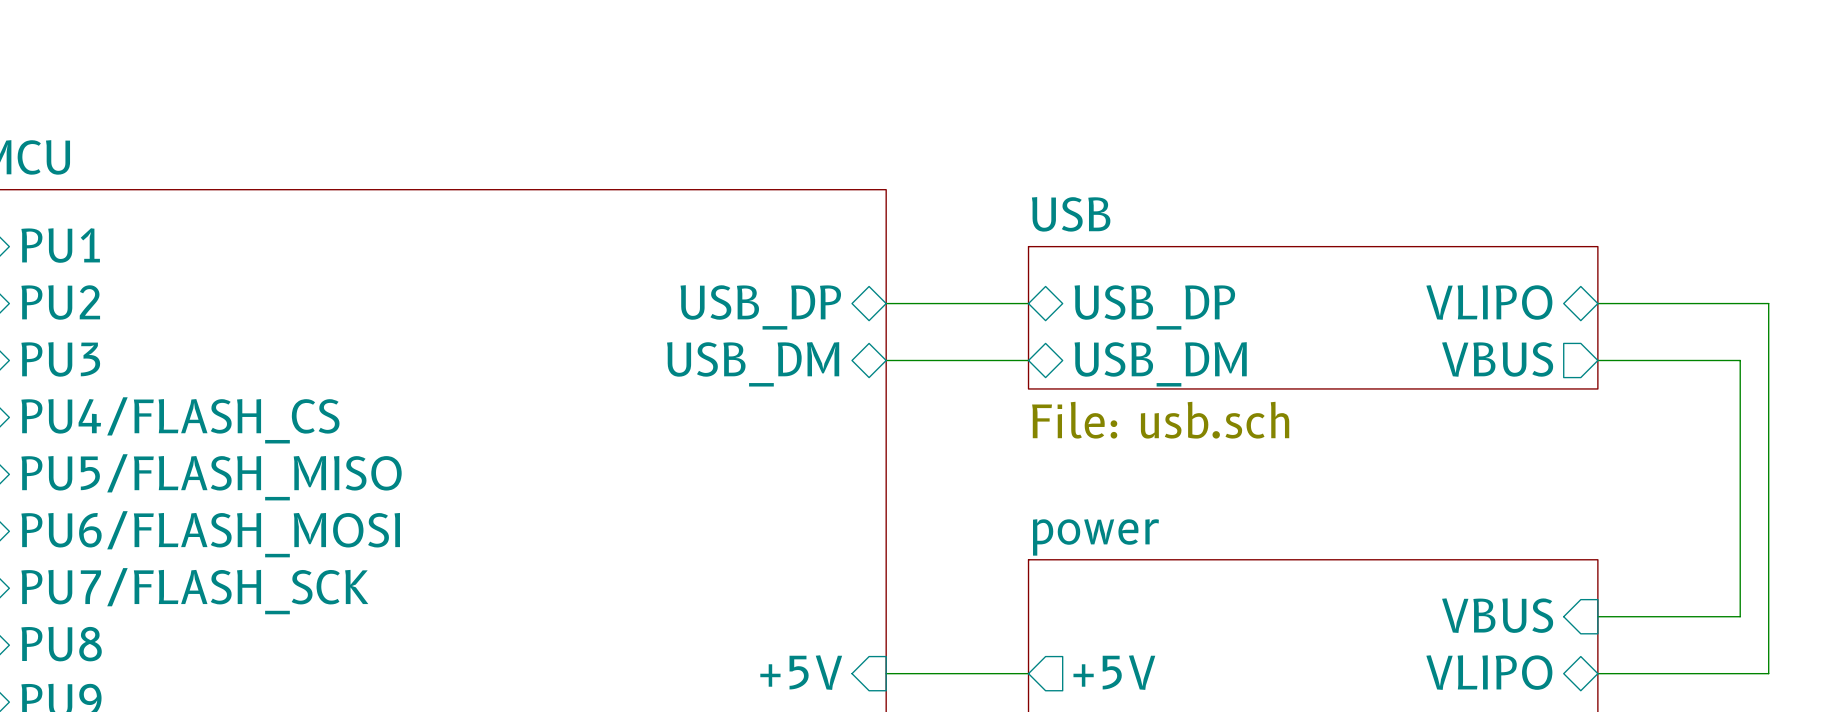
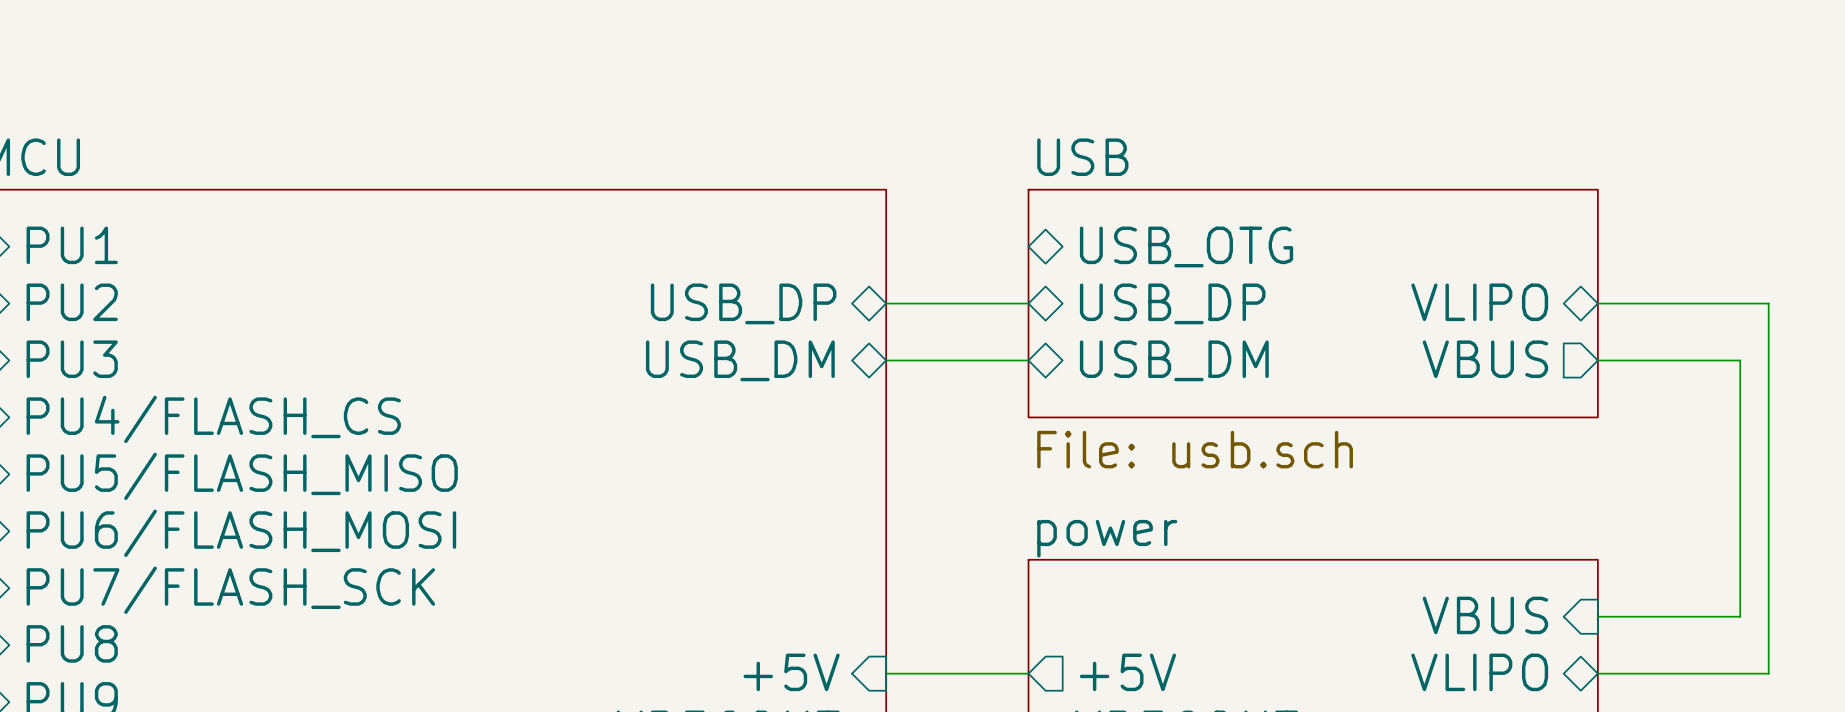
sheet USB shape: [1028, 246, 1598, 389] -> [1028, 189, 1598, 418]
sheet pin: none -> USB_OTG (1186, 246)

